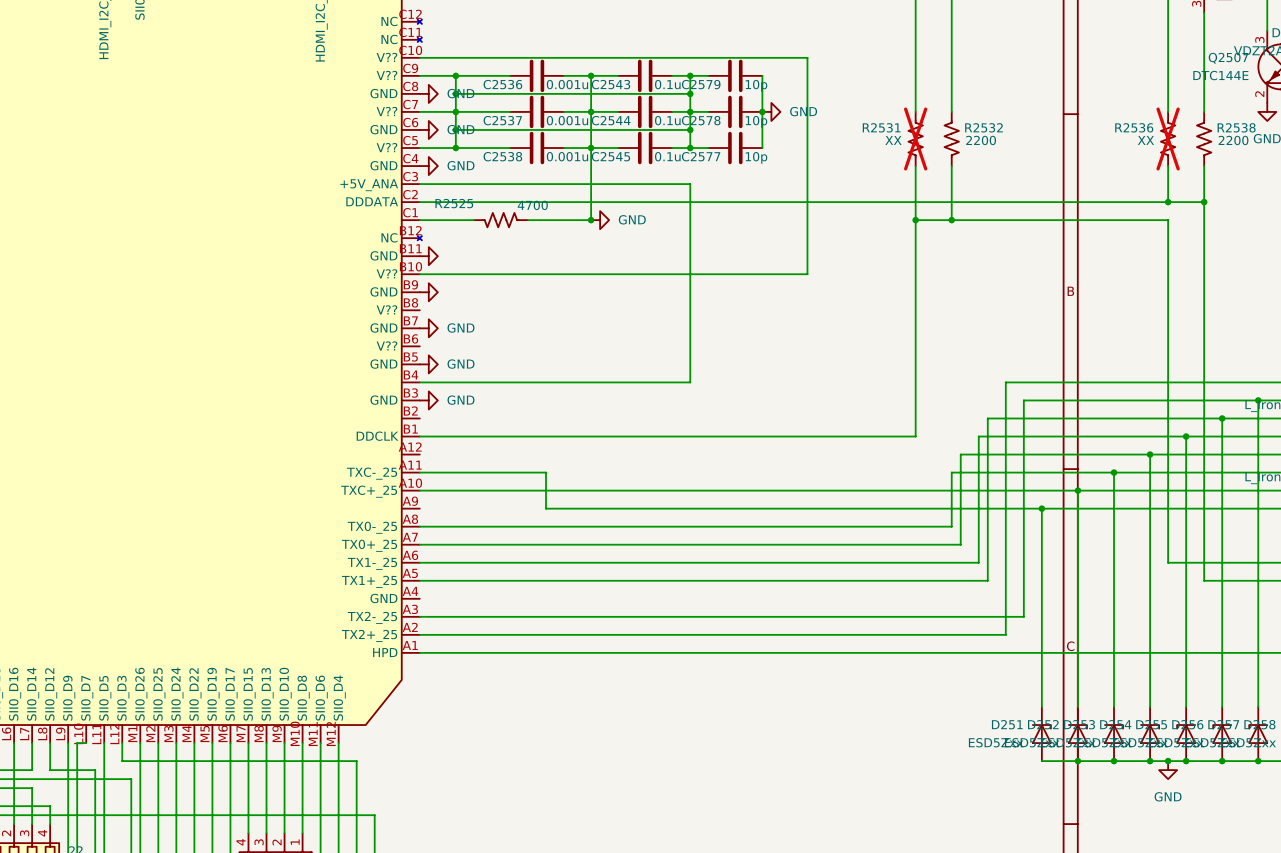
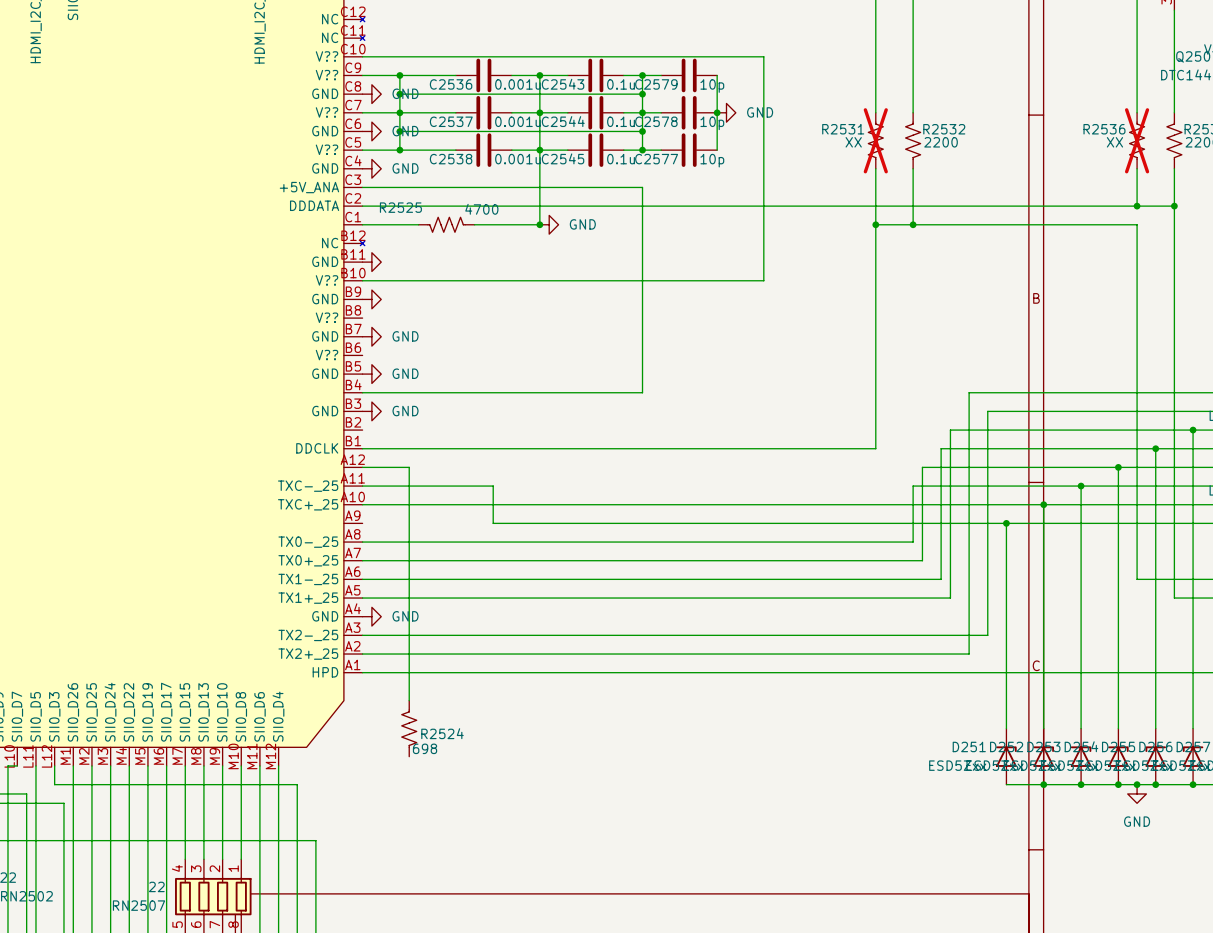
wire: none -> (362, 467) (409, 467) (409, 700)
power symbol: none -> GND (371, 616)
R2524: none -> 698 (409, 728)

